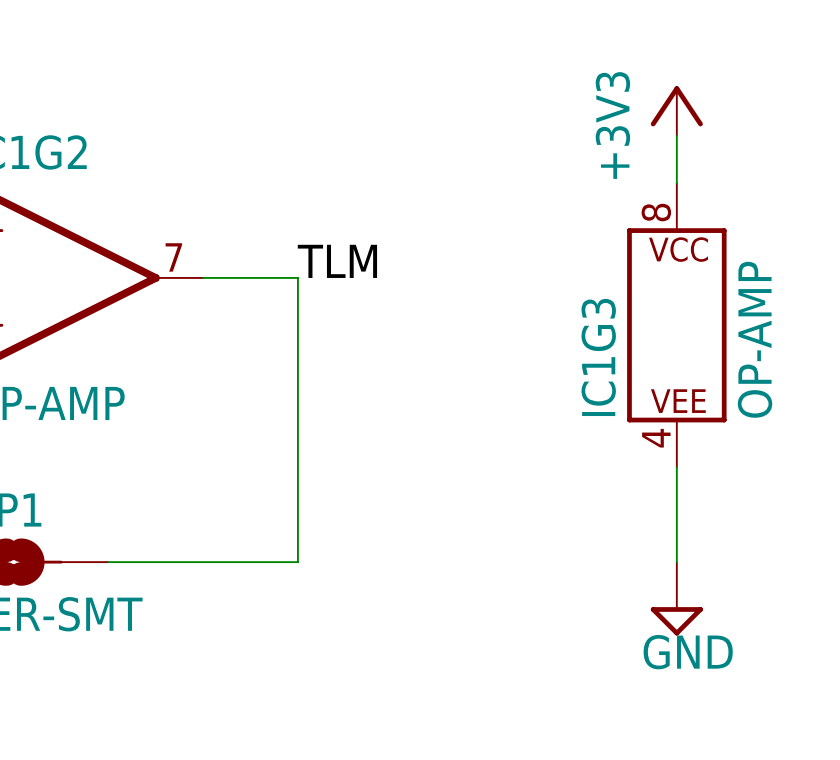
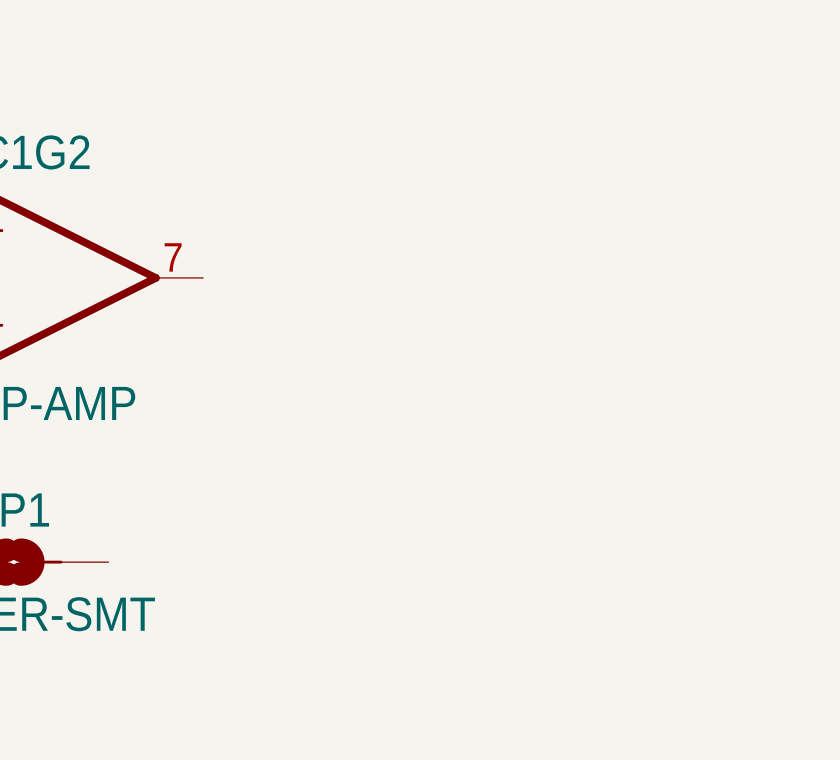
power symbol: +3V3 (676, 111) -> none
wire: (676, 135) (676, 183) -> none
label: TLM (337, 261) -> none
wire: (203, 277) (297, 277) (297, 562) (108, 562) -> none
IC1G3: OP-AMP (676, 325) -> none
wire: (676, 467) (676, 562) -> none
power symbol: GND (676, 598) -> none

